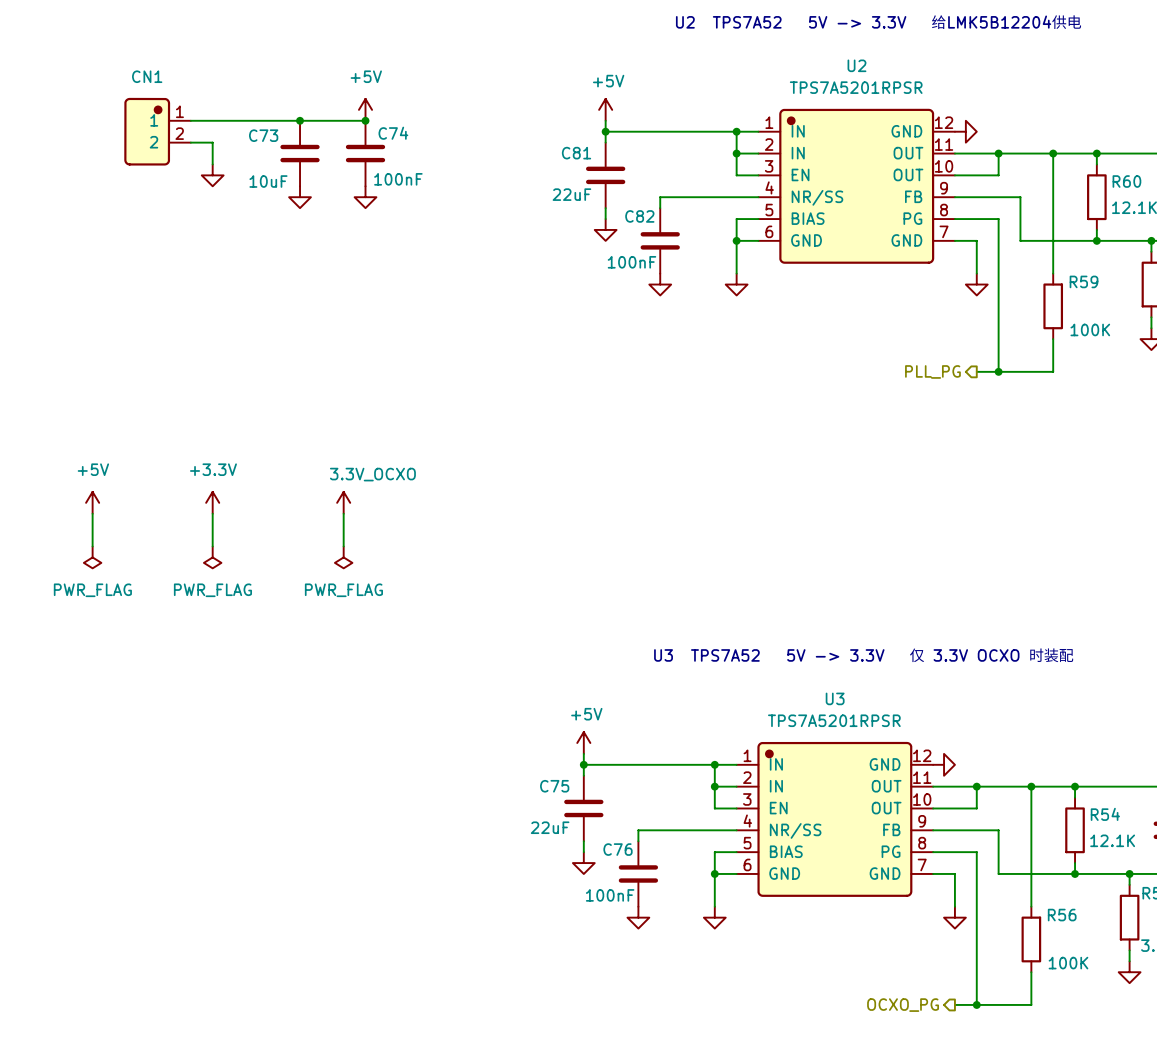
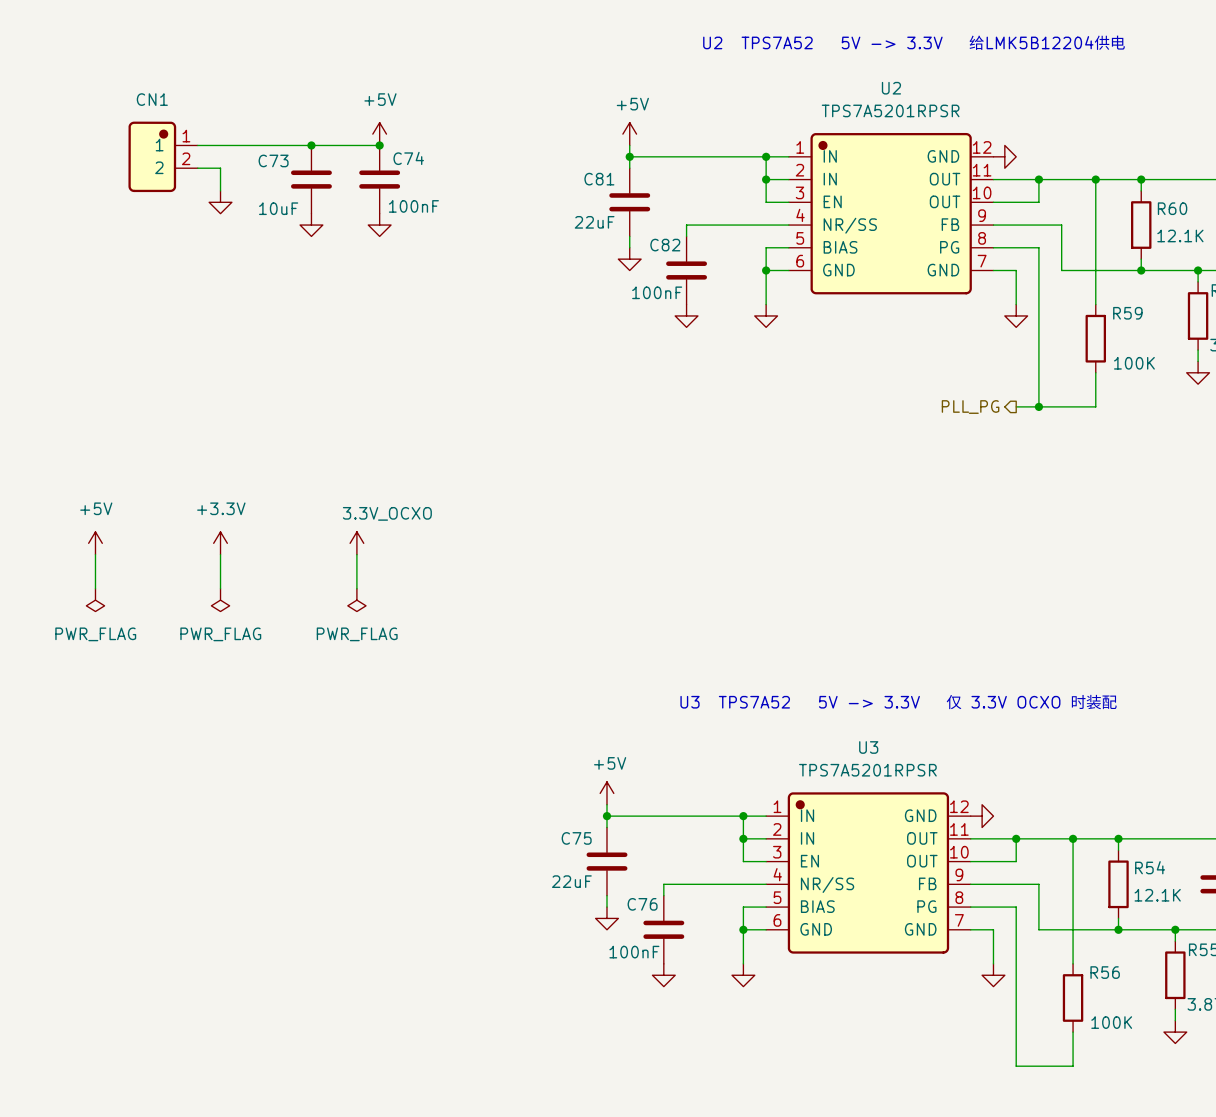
wire: (954, 1004) (976, 1004) -> none
junction: (976, 1004) -> none
hierarchical label: OCXO_PG (903, 1005) -> none

